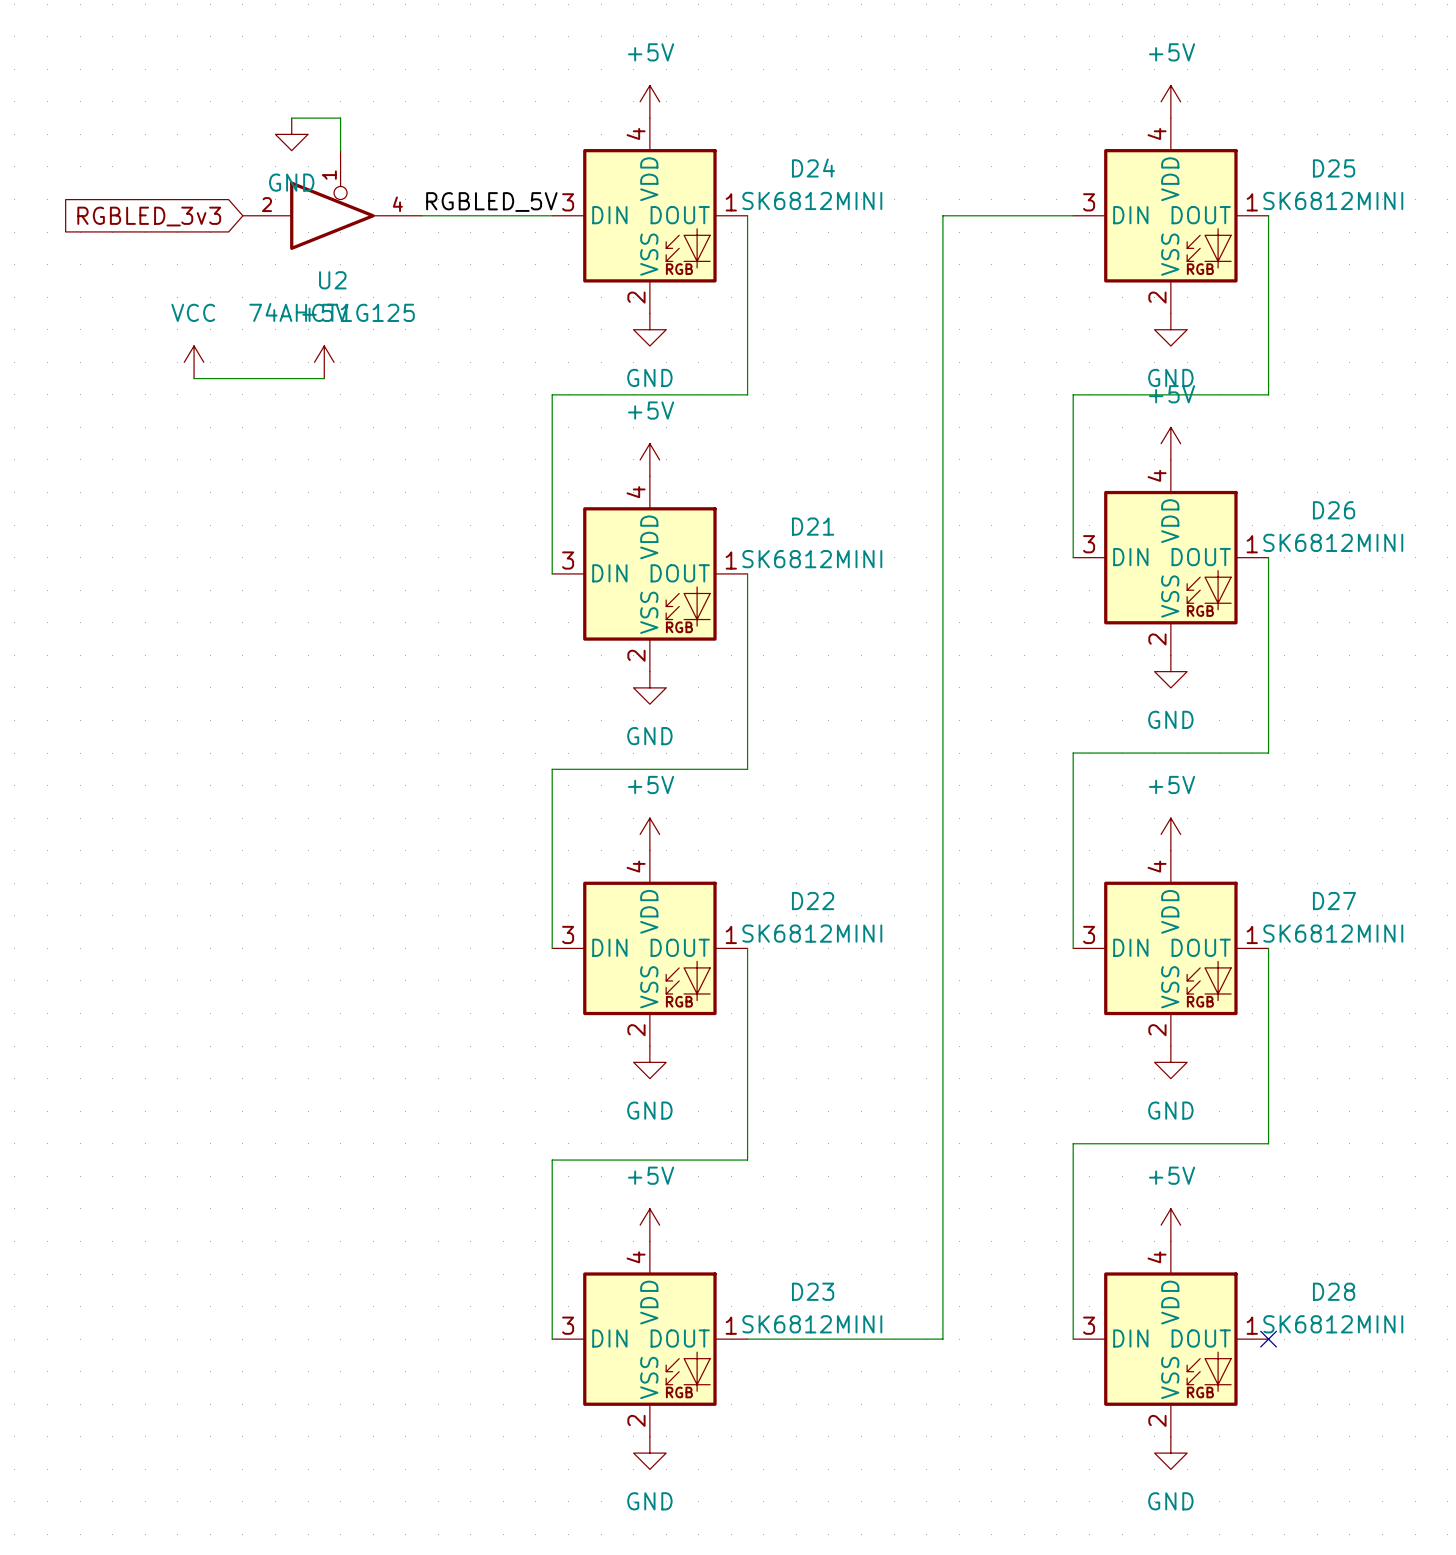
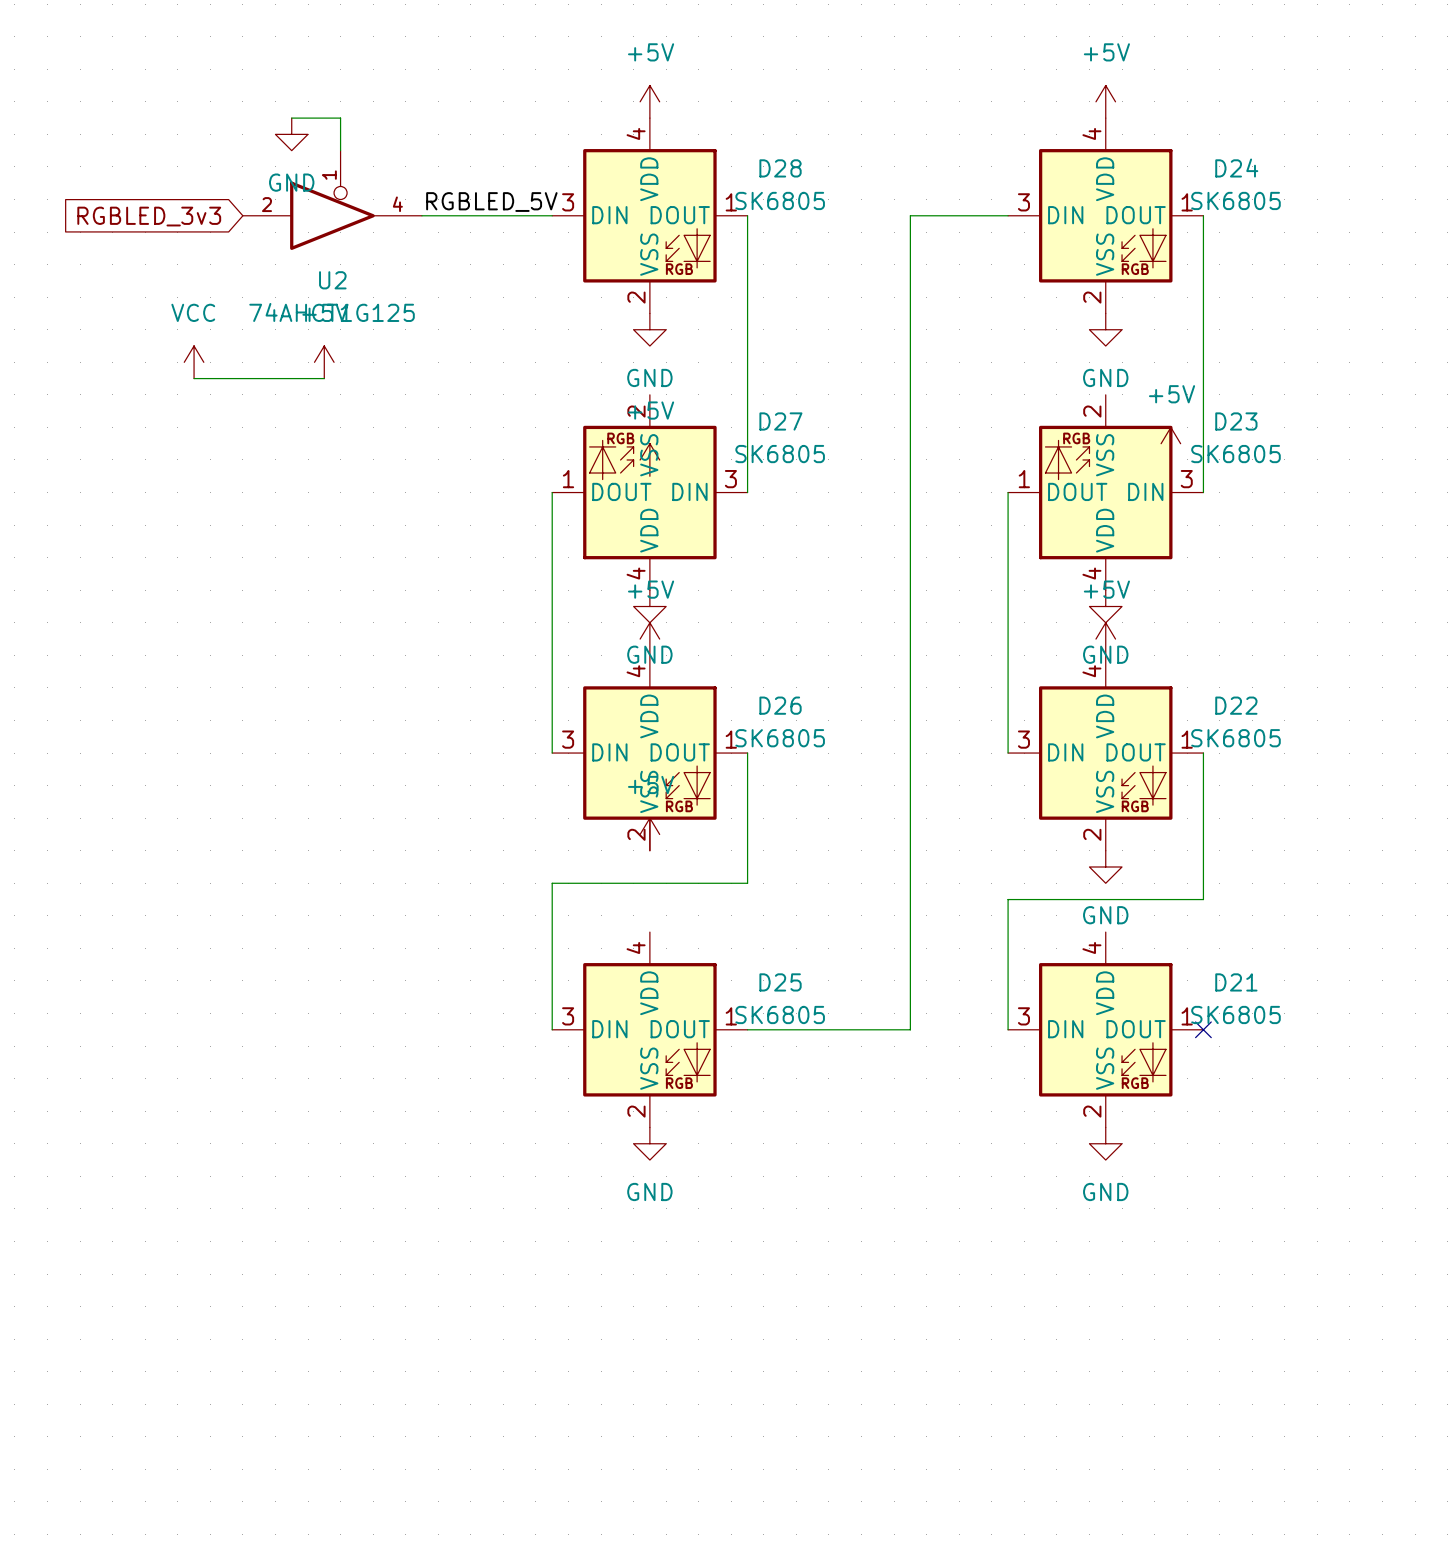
power symbol position: +5V (1170, 101) -> +5V (1105, 101)
D24 name: D24 (813, 168) -> D28 (780, 168)
D25 name position: D25 (1334, 168) -> D25 (780, 982)
D24 value: SK6812MINI (812, 200) -> SK6805 (780, 200)
D25 value: SK6812MINI (1333, 200) -> SK6805 (780, 1014)
wire: (942, 215) (942, 1339) (747, 1339) -> (942, 215) (910, 215) (910, 1029) (747, 1029)
D24: none -> SK6805 (1105, 215)
D25 position: (1170, 215) -> (649, 1029)
wire: none -> (1203, 215) (1203, 492)
wire: (1268, 215) (1268, 394) (1073, 394) (1073, 557) -> none
power symbol position: GND (1170, 329) -> GND (1105, 329)
wire: (747, 394) (552, 394) (552, 492) -> (747, 394) (747, 492)
wire: none -> (1008, 492) (1008, 753)
D26 name position: D26 (1334, 510) -> D26 (780, 705)
D21 name position: D21 (813, 526) -> D21 (1236, 982)
D26 value: SK6812MINI (1333, 542) -> SK6805 (780, 738)
D26 position: (1170, 557) -> (649, 753)
wire: (1268, 557) (1268, 753) (1073, 753) (1073, 948) -> none
D21 value: SK6812MINI (812, 559) -> SK6805 (1235, 1014)
D21 position: (649, 573) -> (1105, 1029)
wire: (747, 573) (747, 753) -> (552, 573) (552, 753)
power symbol: none -> +5V (649, 639)
power symbol position: GND (1170, 671) -> GND (1105, 606)
power symbol position: GND (649, 687) -> GND (649, 606)
wire: none -> (1203, 753) (1203, 899) (1008, 899) (1008, 1029)
wire: (747, 769) (552, 769) (552, 883) -> (747, 769) (747, 883) (552, 883)
power symbol position: +5V (1170, 834) -> +5V (1105, 639)
power symbol: none -> GND (1105, 866)
D22 name position: D22 (813, 901) -> D22 (1236, 705)
D27 name position: D27 (1334, 901) -> D27 (780, 421)
D22 value: SK6812MINI (812, 933) -> SK6805 (1235, 738)
D27 value: SK6812MINI (1333, 933) -> SK6805 (780, 454)
wire: none -> (552, 948) (552, 1029)
D22 position: (649, 948) -> (1105, 753)
wire: (747, 948) (747, 1160) (552, 1160) (552, 1339) -> none
D27 rotation: 0° (1170, 948) -> 180° (649, 492)
D27 position: (1170, 948) -> (649, 492)
wire: (1268, 948) (1268, 1143) (1073, 1143) (1073, 1339) -> none
no-connect mark: none -> (1203, 1029)
power symbol position: GND (649, 1062) -> GND (649, 1143)
power symbol: GND (1170, 1062) -> none
power symbol: none -> GND (1105, 1143)
power symbol: +5V (649, 1225) -> none
power symbol: +5V (1170, 1225) -> none
D23 name position: D23 (813, 1291) -> D23 (1236, 421)
D23 value: SK6812MINI (812, 1324) -> SK6805 (1235, 454)
D23 rotation: 0° (649, 1339) -> 180° (1105, 492)
D23 position: (649, 1339) -> (1105, 492)
D28: SK6812MINI (1170, 1339) -> none
no-connect mark: (1268, 1339) -> none
power symbol: GND (649, 1453) -> none
power symbol: GND (1170, 1453) -> none

